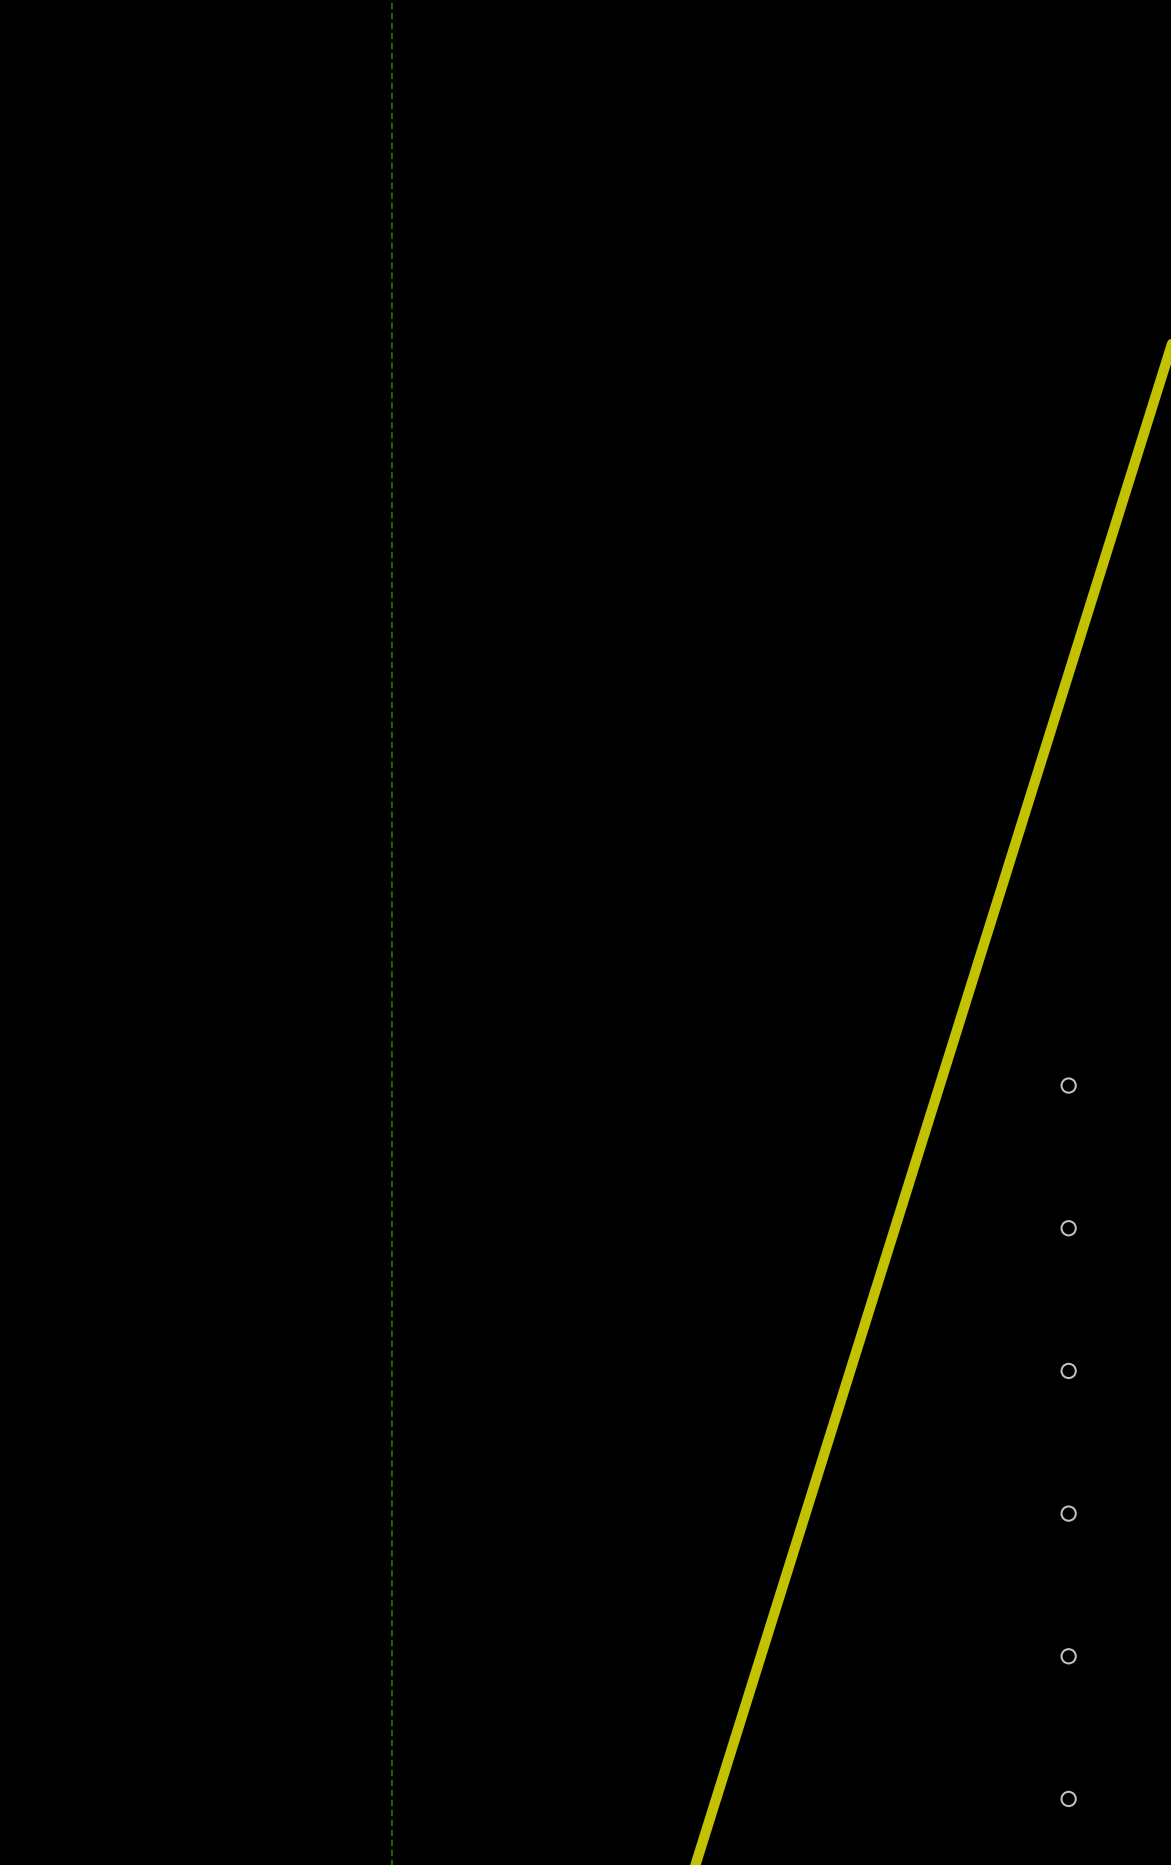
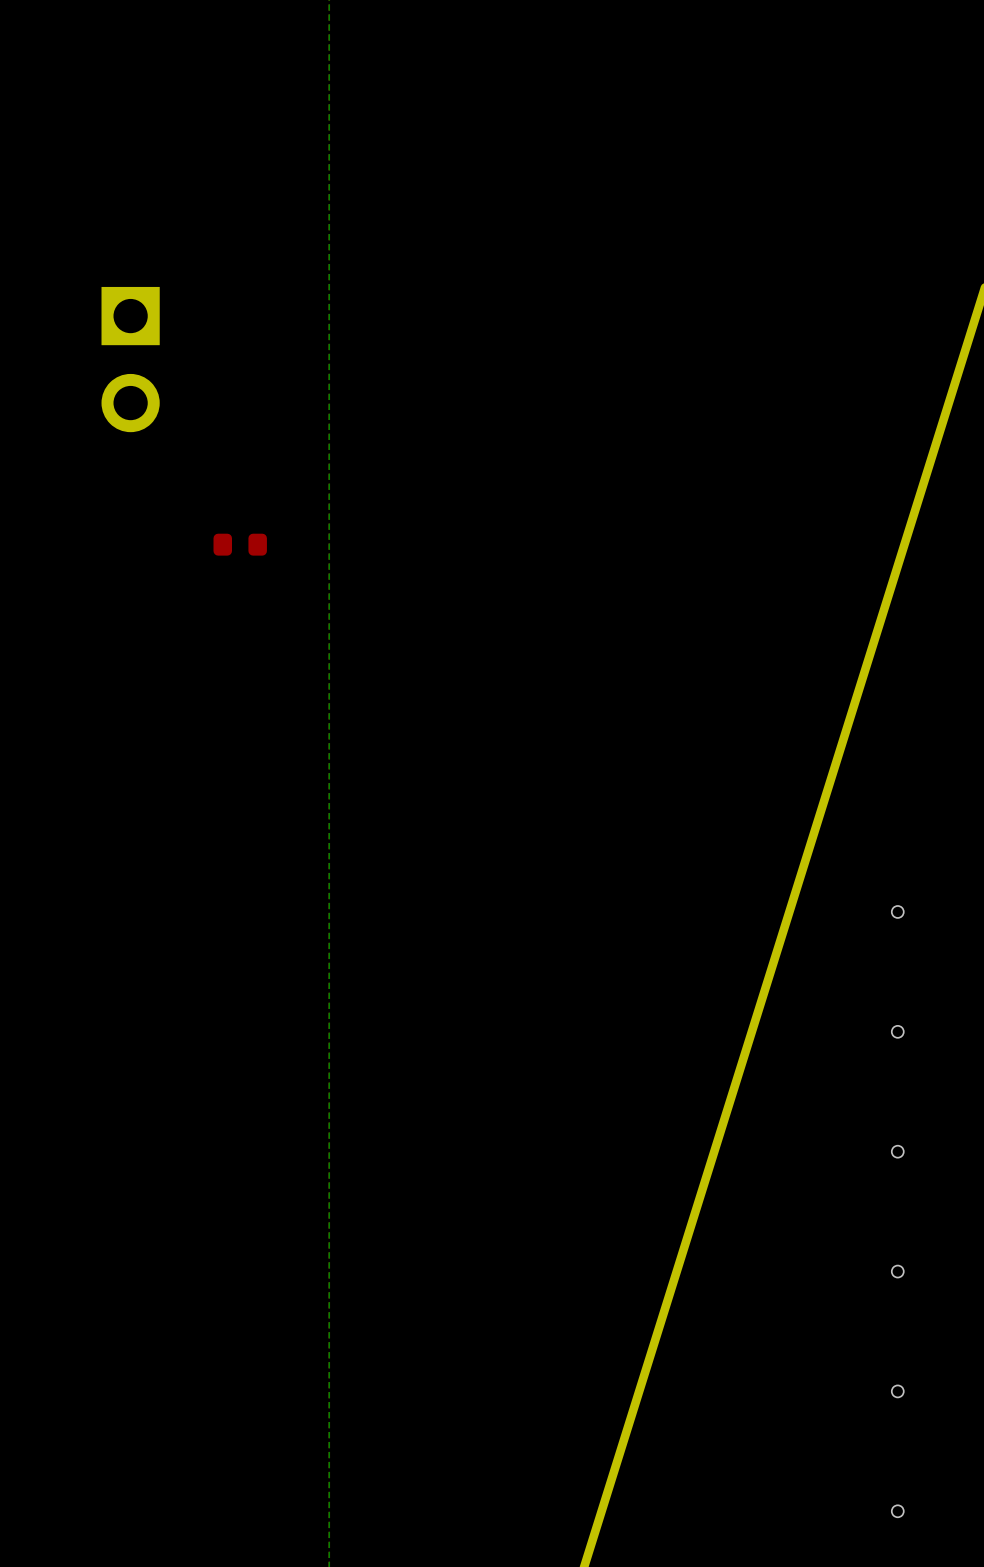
part: none -> (130, 359)
part: none -> (240, 544)

